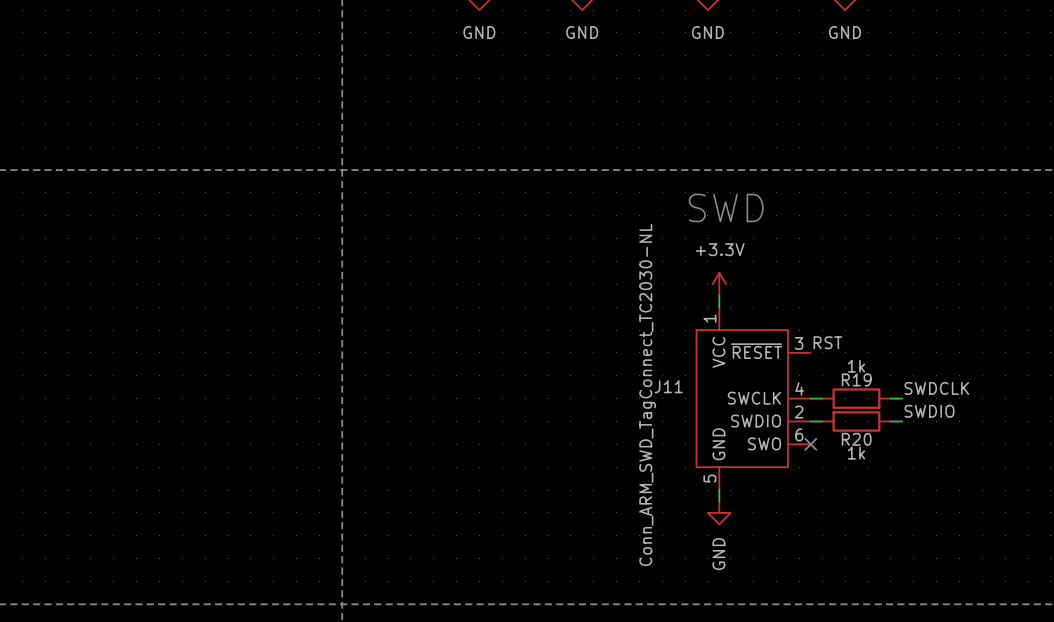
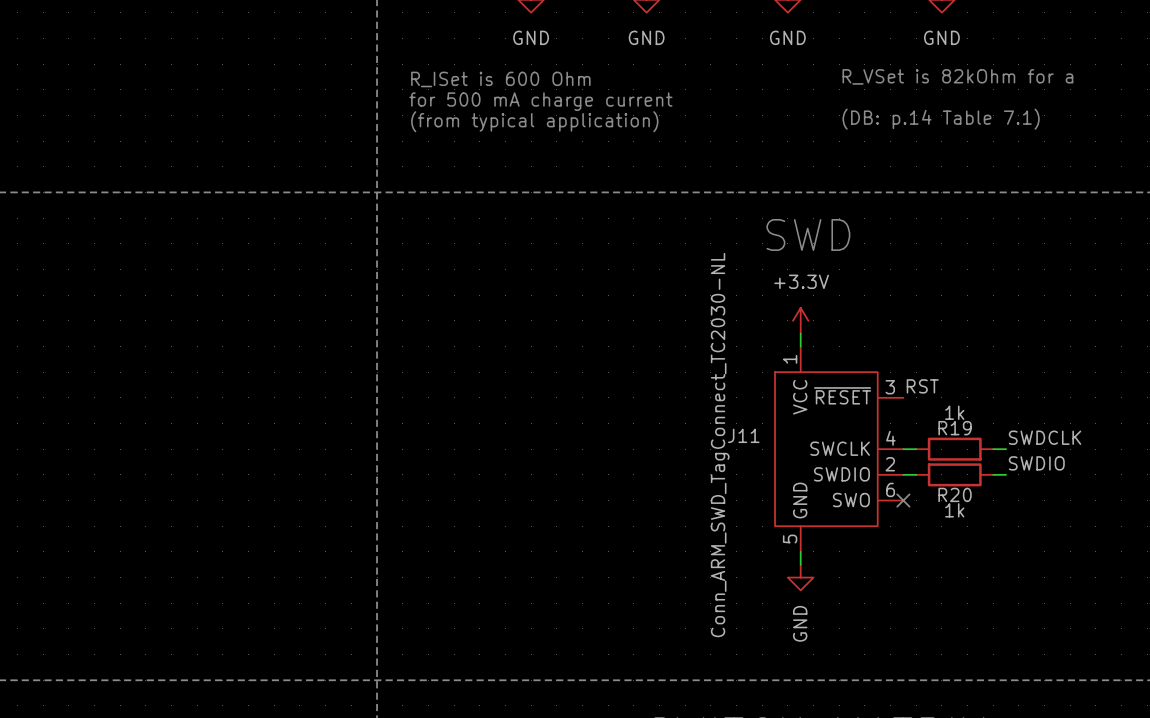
text: none -> R_VSet is 82kOhm for a (957, 76)
text: none -> R_ISet is 600 Ohm (500, 79)
text: none -> for 500 mA charge current (540, 101)
text: none -> (DB: p.14 Table 7.1) (941, 119)
text: none -> (from typical application) (534, 121)

